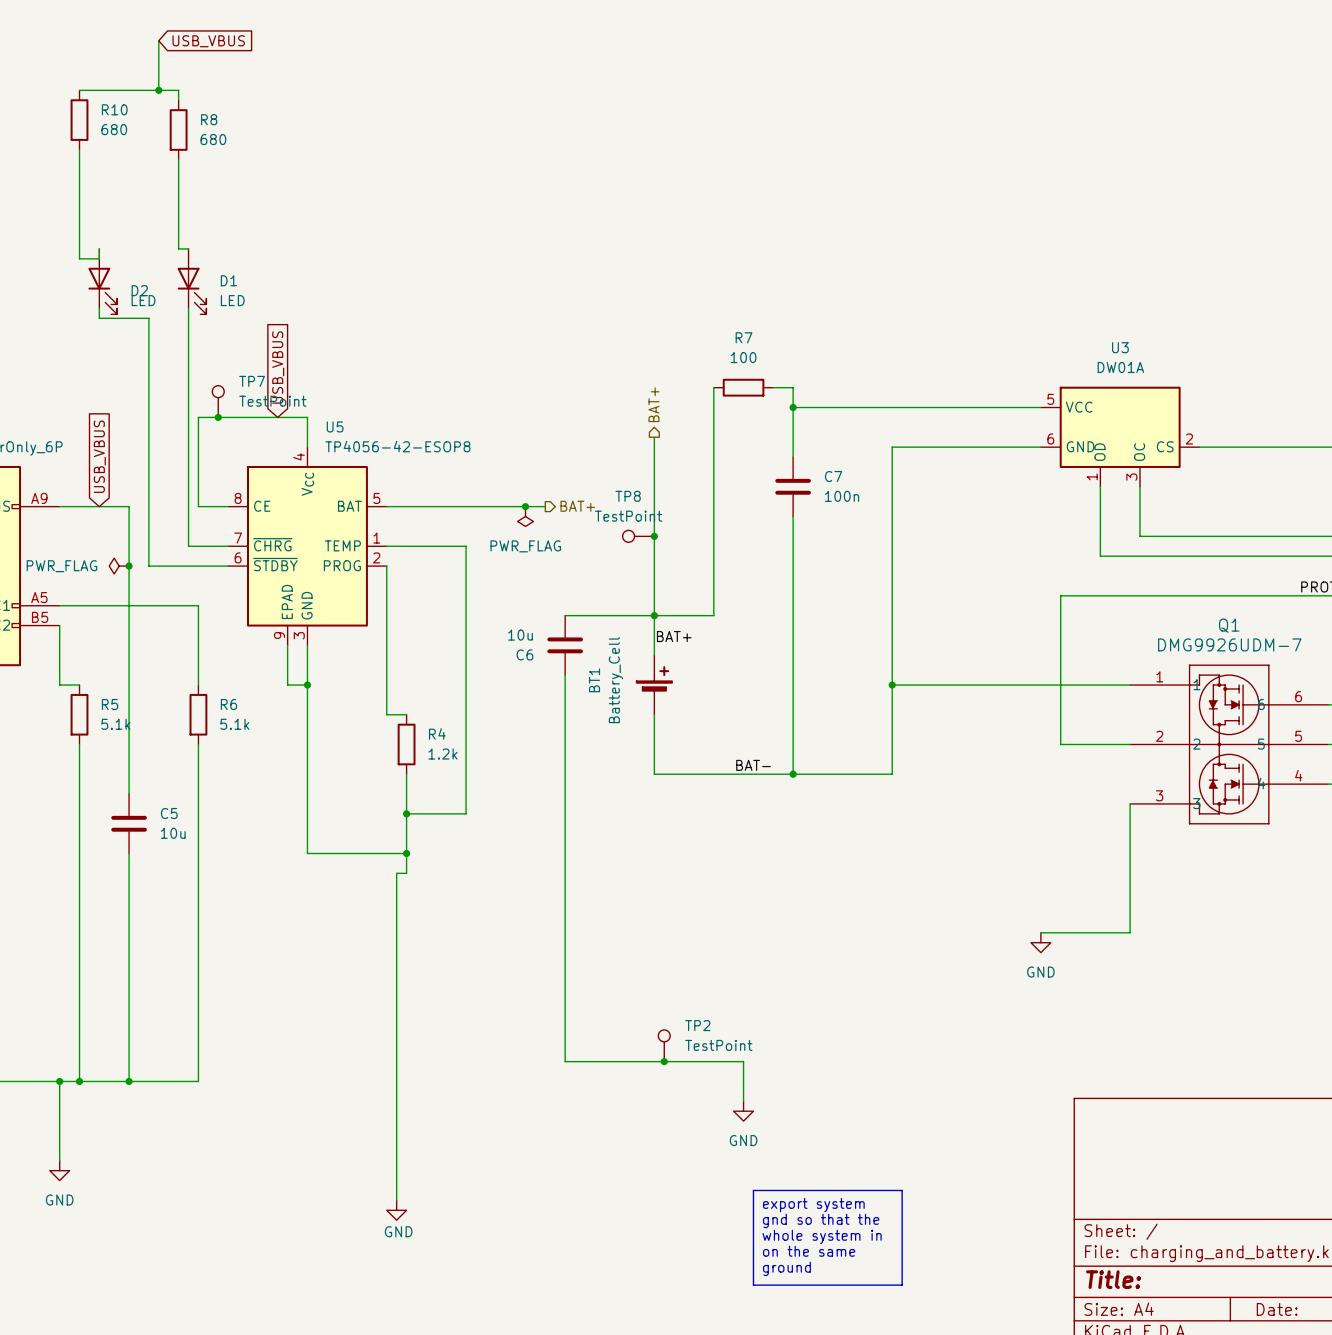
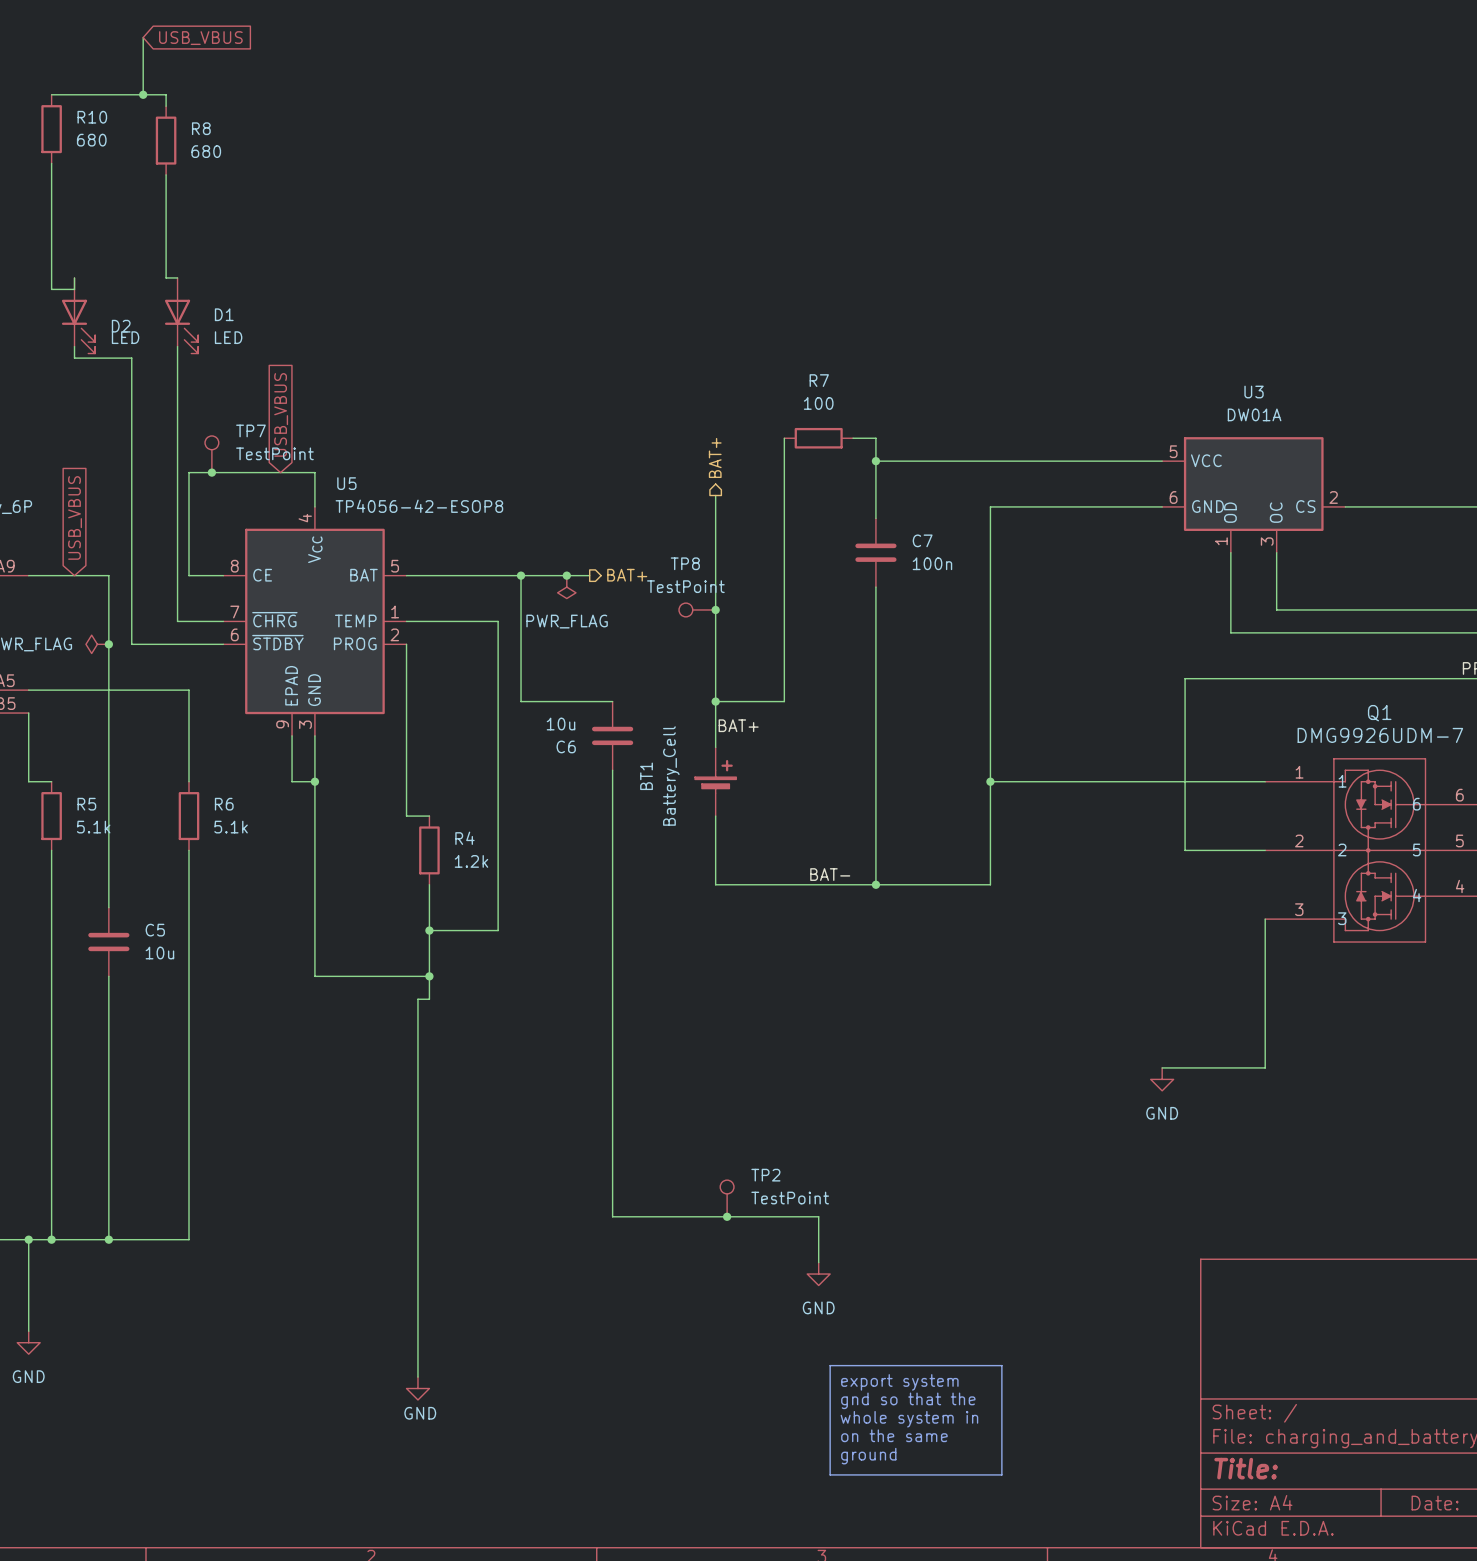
junction: none -> (521, 575)
wire: (565, 615) (654, 615) -> (612, 701) (521, 701) (521, 575)

